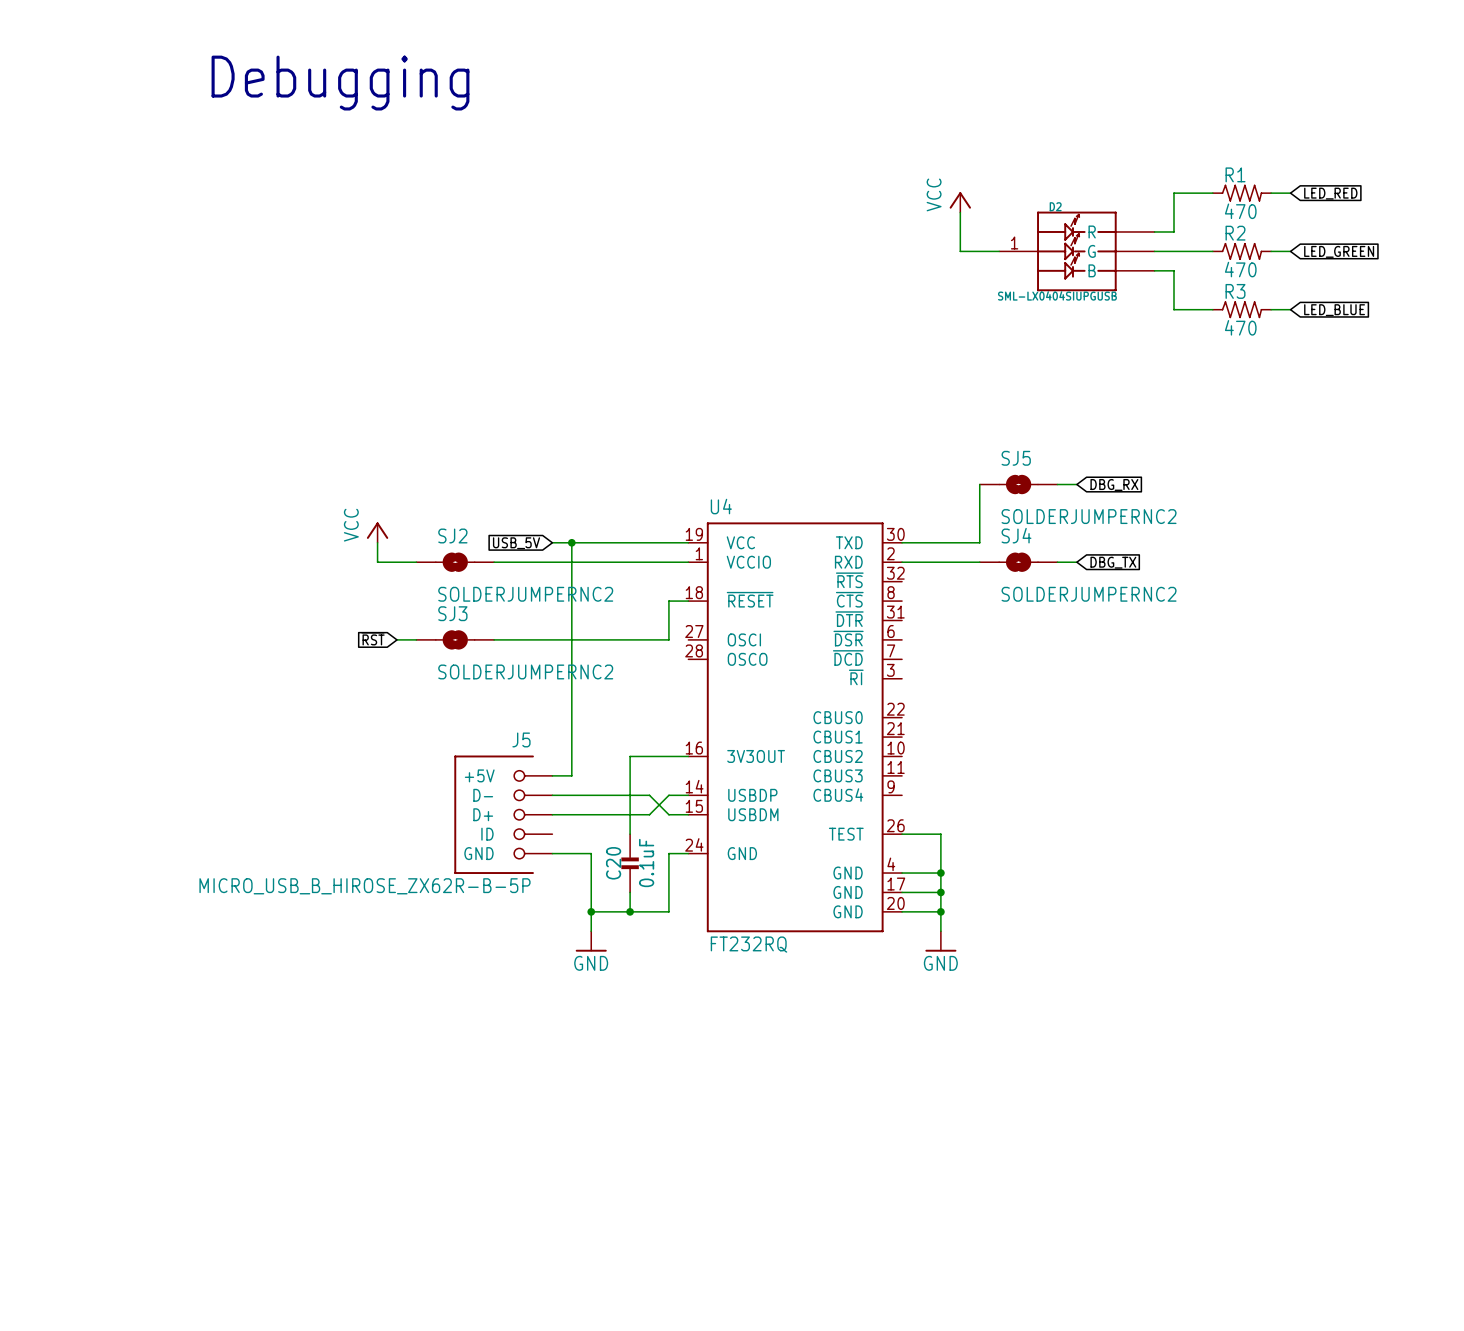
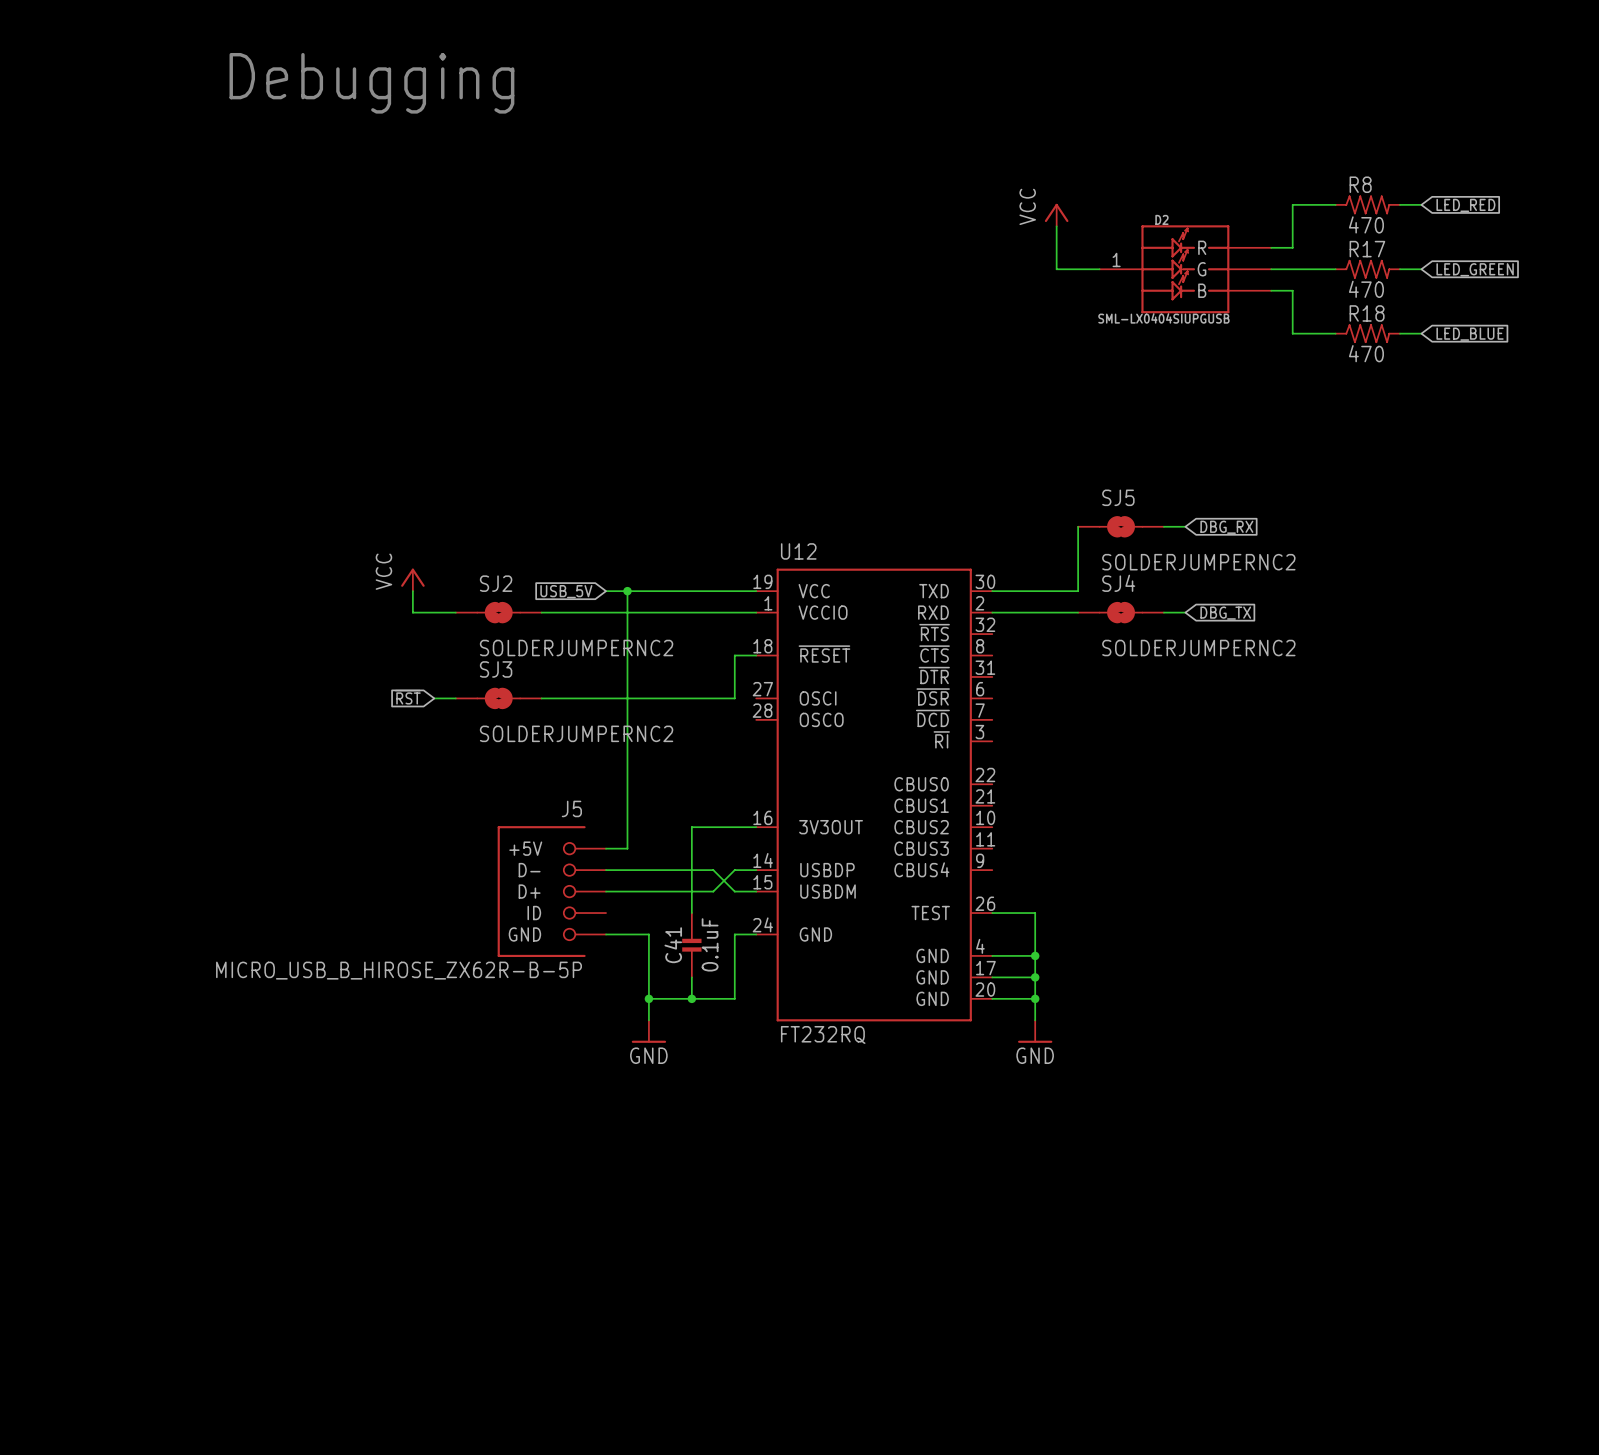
R1 name: R1 (1235, 174) -> R8 (1360, 184)
R2 name: R2 (1235, 233) -> R17 (1367, 249)
R3 name: R3 (1235, 291) -> R18 (1367, 313)
U4 name: U4 (721, 506) -> U12 (798, 551)
C20 name: C20 (613, 863) -> C41 (673, 945)

